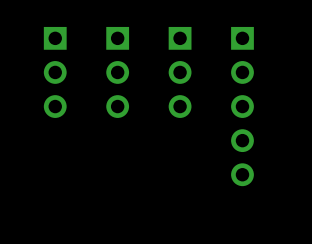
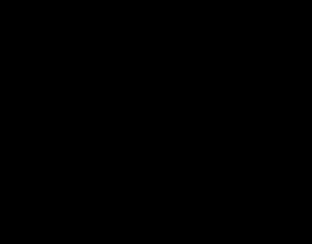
part: (55, 72) -> none
part: (117, 72) -> none
part: (180, 72) -> none
part: (242, 106) -> none

